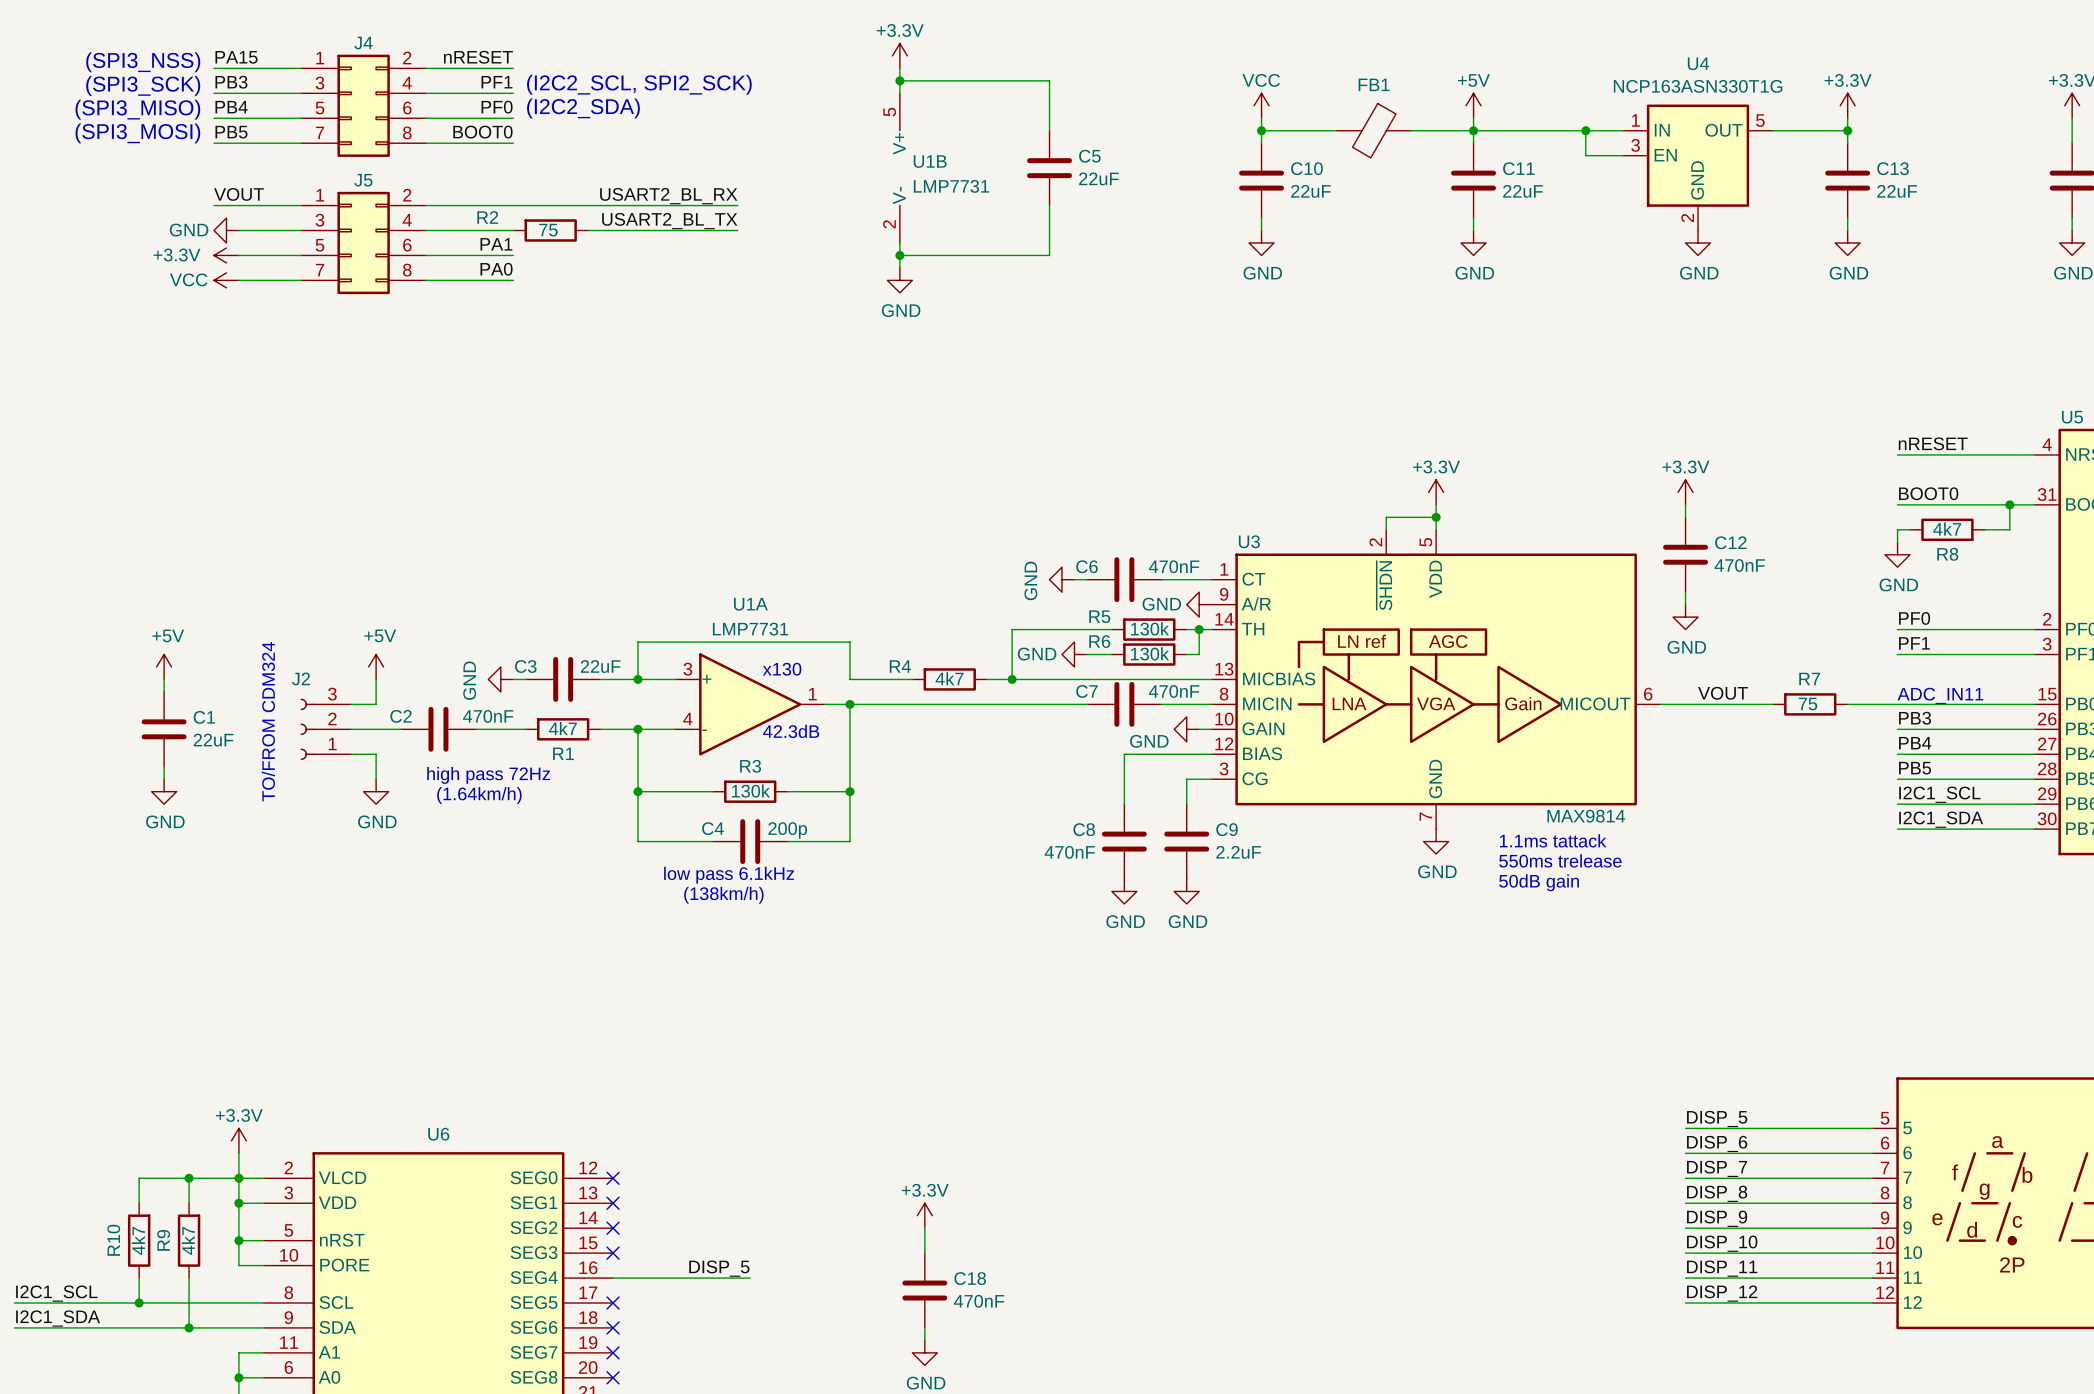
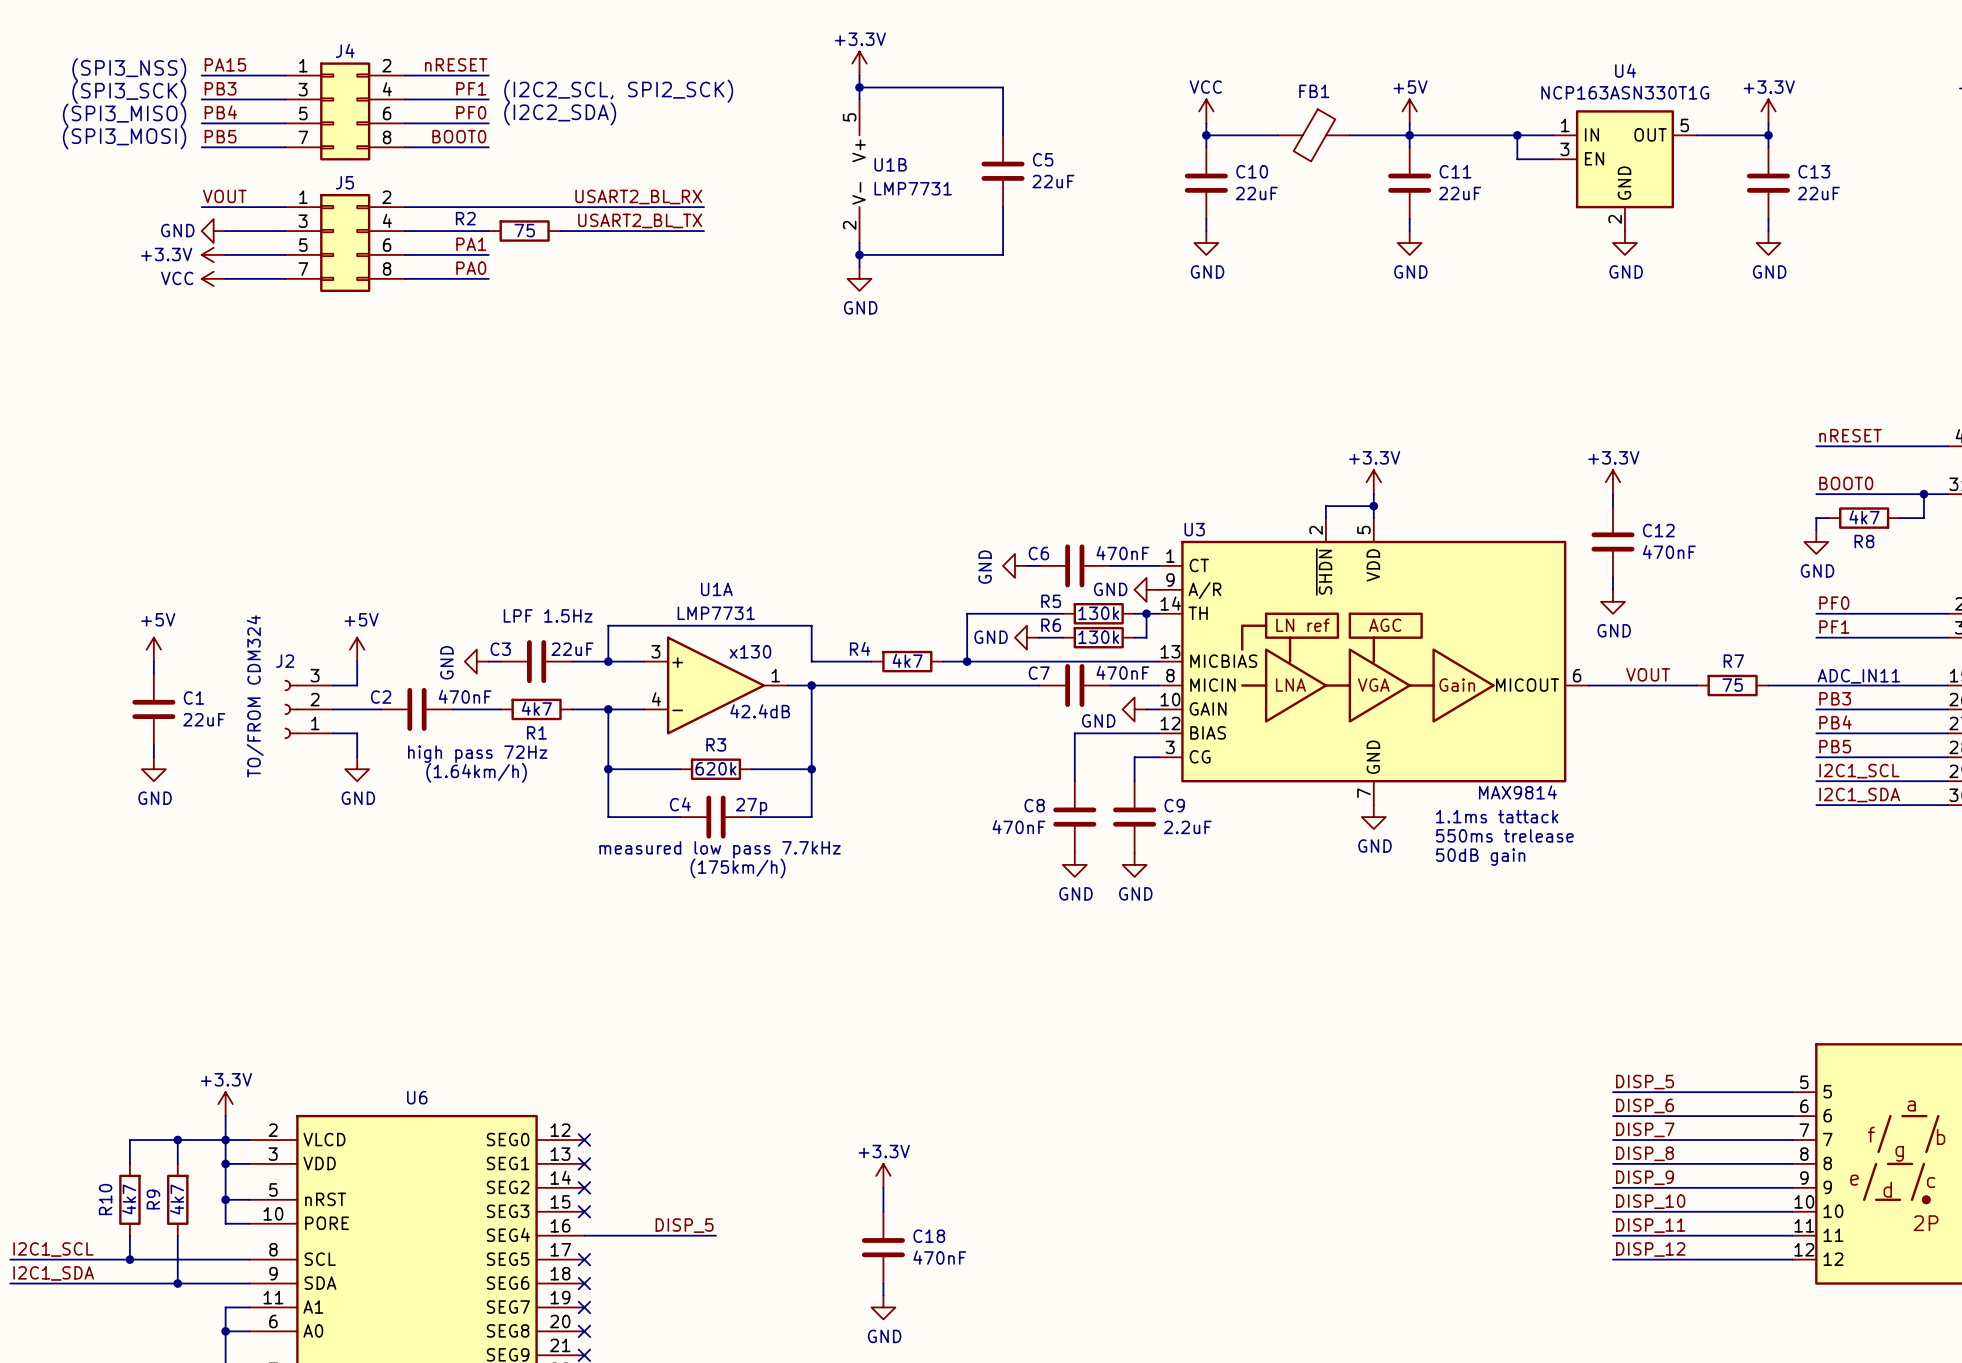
text: none -> LPF 1.5Hz (548, 615)
text: 42.3dB (791, 731) -> 42.4dB (760, 711)
R3 value: 130k (750, 790) -> 620k (715, 768)
C4 value: 200p (787, 830) -> 27p (751, 806)
text: low pass 6.1kHz (729, 875) -> measured low pass 7.7kHz (720, 849)
text: (138km/h) (723, 895) -> (175km/h) (738, 868)

